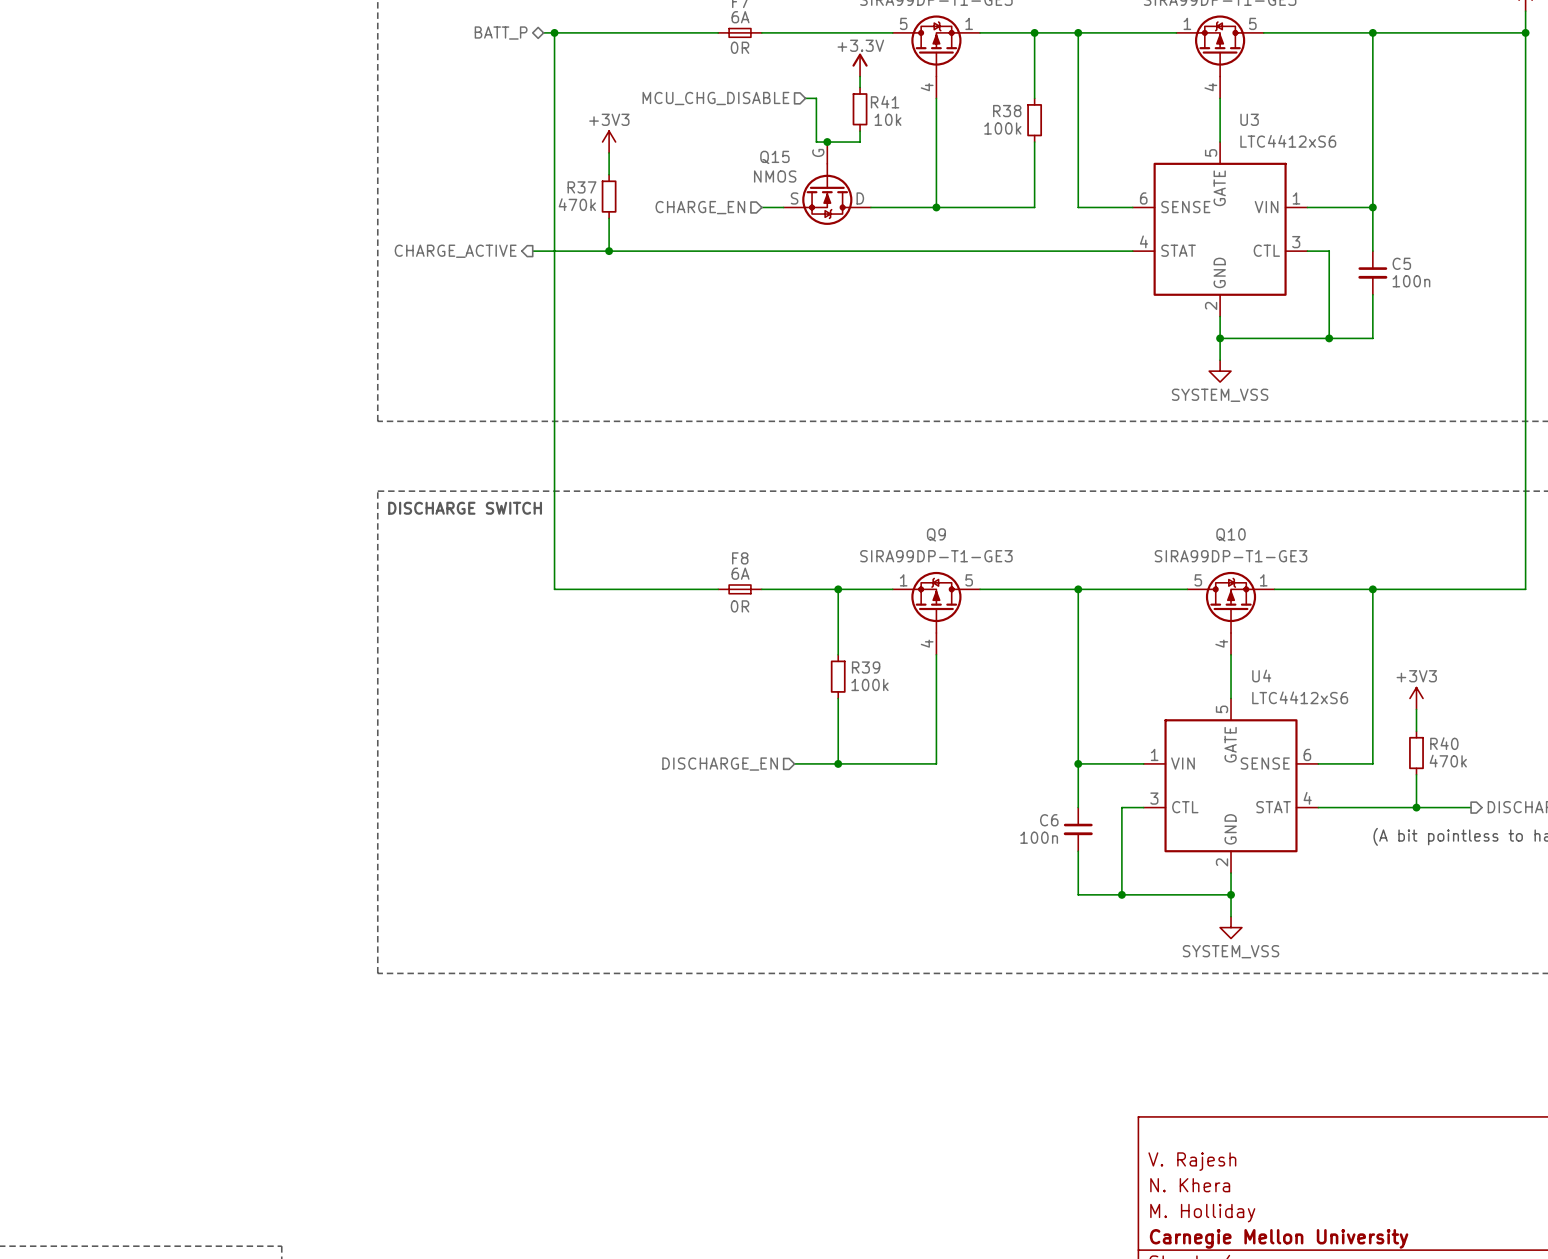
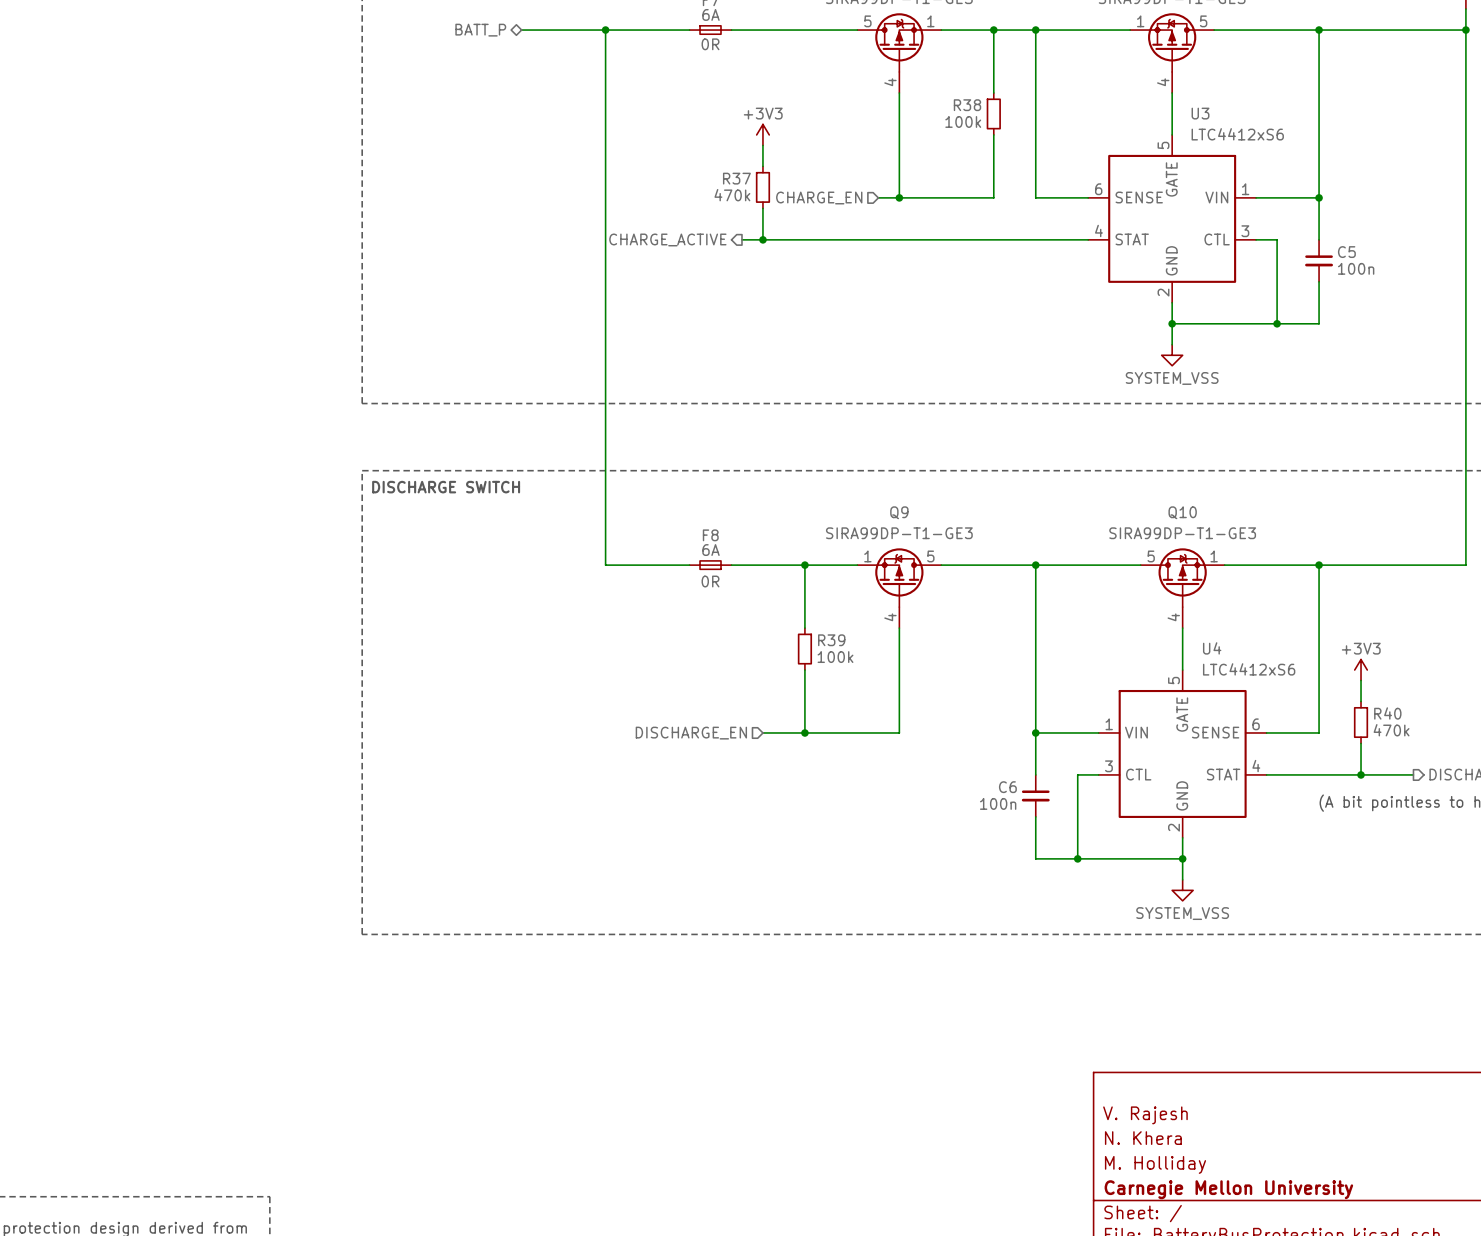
wire: (554, 32) (554, 589) (630, 589) -> (605, 30) (605, 565)
junction: (554, 32) -> none
junction: none -> (605, 30)
power symbol: +3.3V (860, 65) -> none
wire: (860, 76) (860, 87) -> none
hierarchical label: MCU_CHG_DISABLE (715, 98) -> none
wire: (805, 98) (816, 98) (816, 142) (860, 142) (860, 131) -> none
R41: 10k (860, 109) -> none
power symbol position: +3V3 (609, 142) -> +3V3 (762, 134)
junction: (827, 142) -> none
wire: (609, 152) (609, 174) -> (762, 145) (762, 166)
Q15: NMOS (827, 183) -> none
R37 position: (609, 196) -> (762, 187)
hierarchical label position: CHARGE_EN (700, 207) -> CHARGE_EN (819, 198)
wire: (761, 207) (783, 207) -> none
wire: (870, 207) (914, 207) -> none
wire: (609, 218) (609, 251) -> (762, 208) (762, 239)
hierarchical label: CHARGE_ACTIVE (455, 251) -> none
wire: (532, 251) (772, 251) -> none
junction: (609, 251) -> none
hierarchical label: none -> CHARGE_ACTIVE (667, 239)
junction: none -> (762, 239)

